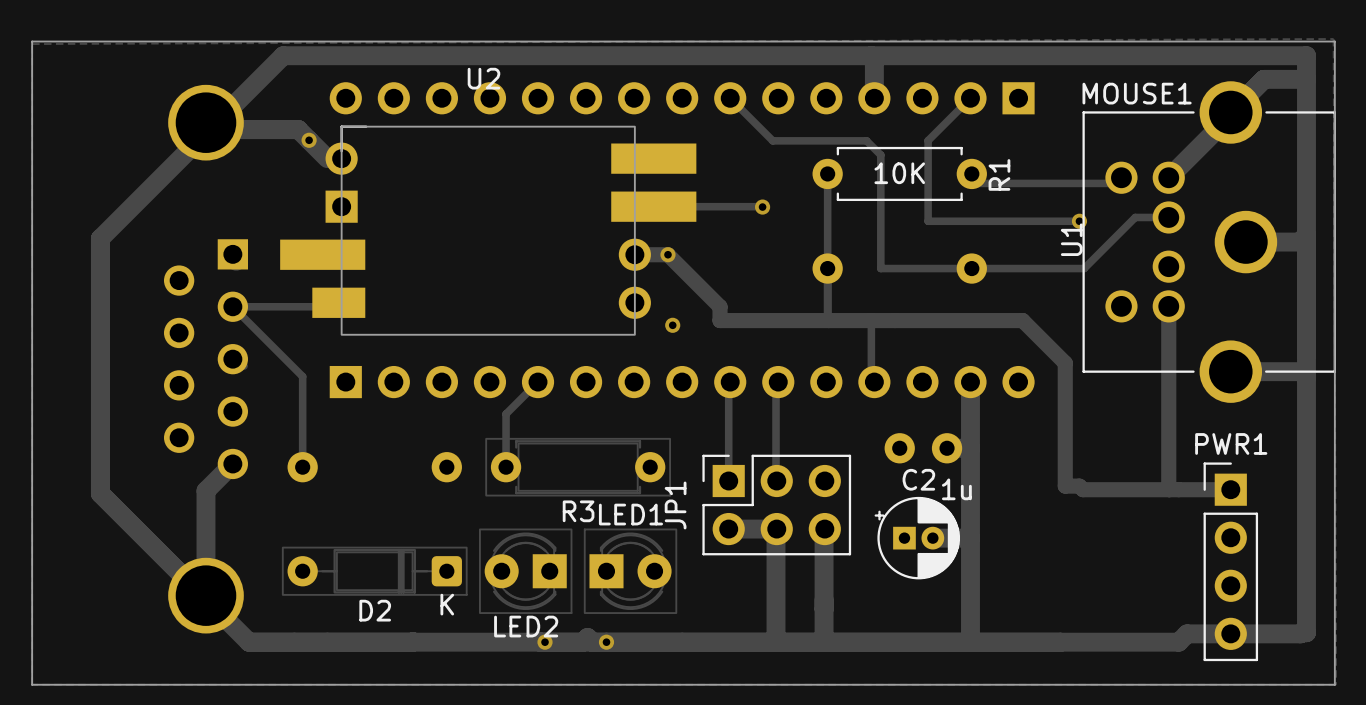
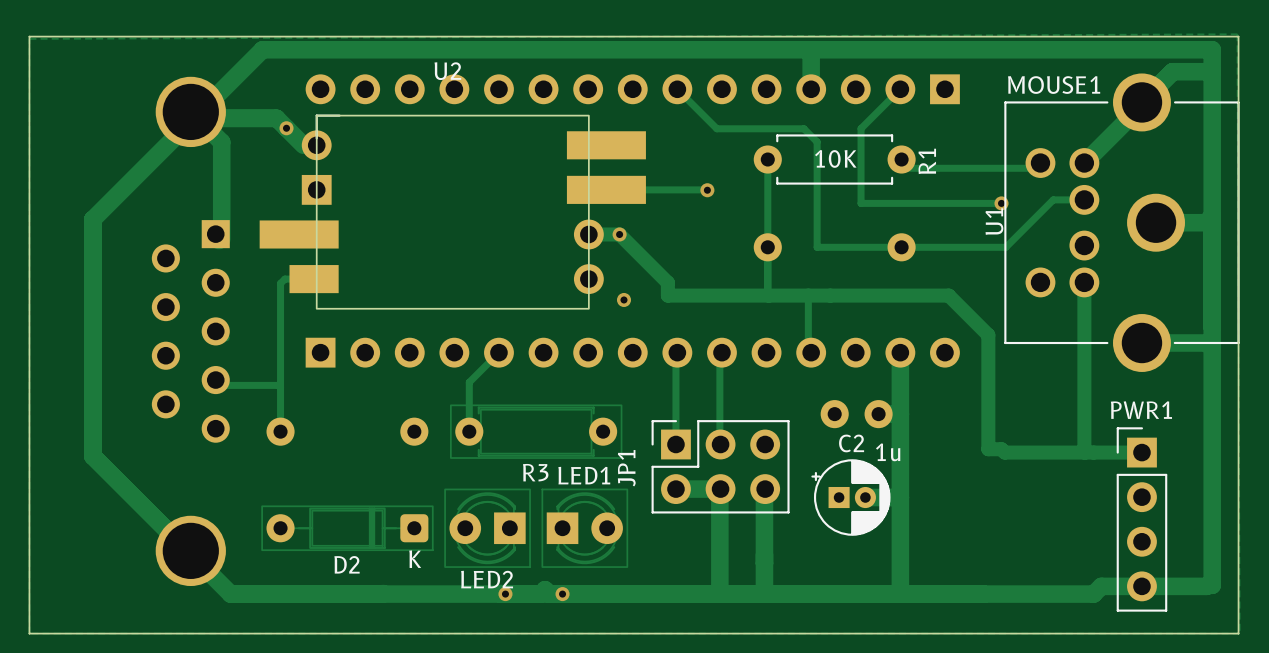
track: none -> (196, 117) (221, 142) (221, 239)
track: (329, 306) (232, 306) (302, 376) -> (308, 279) (284, 279) (280, 283) (280, 347)
track: none -> (221, 385) (278, 385) (280, 387)
track: (232, 463) (205, 490) (205, 595) -> none

